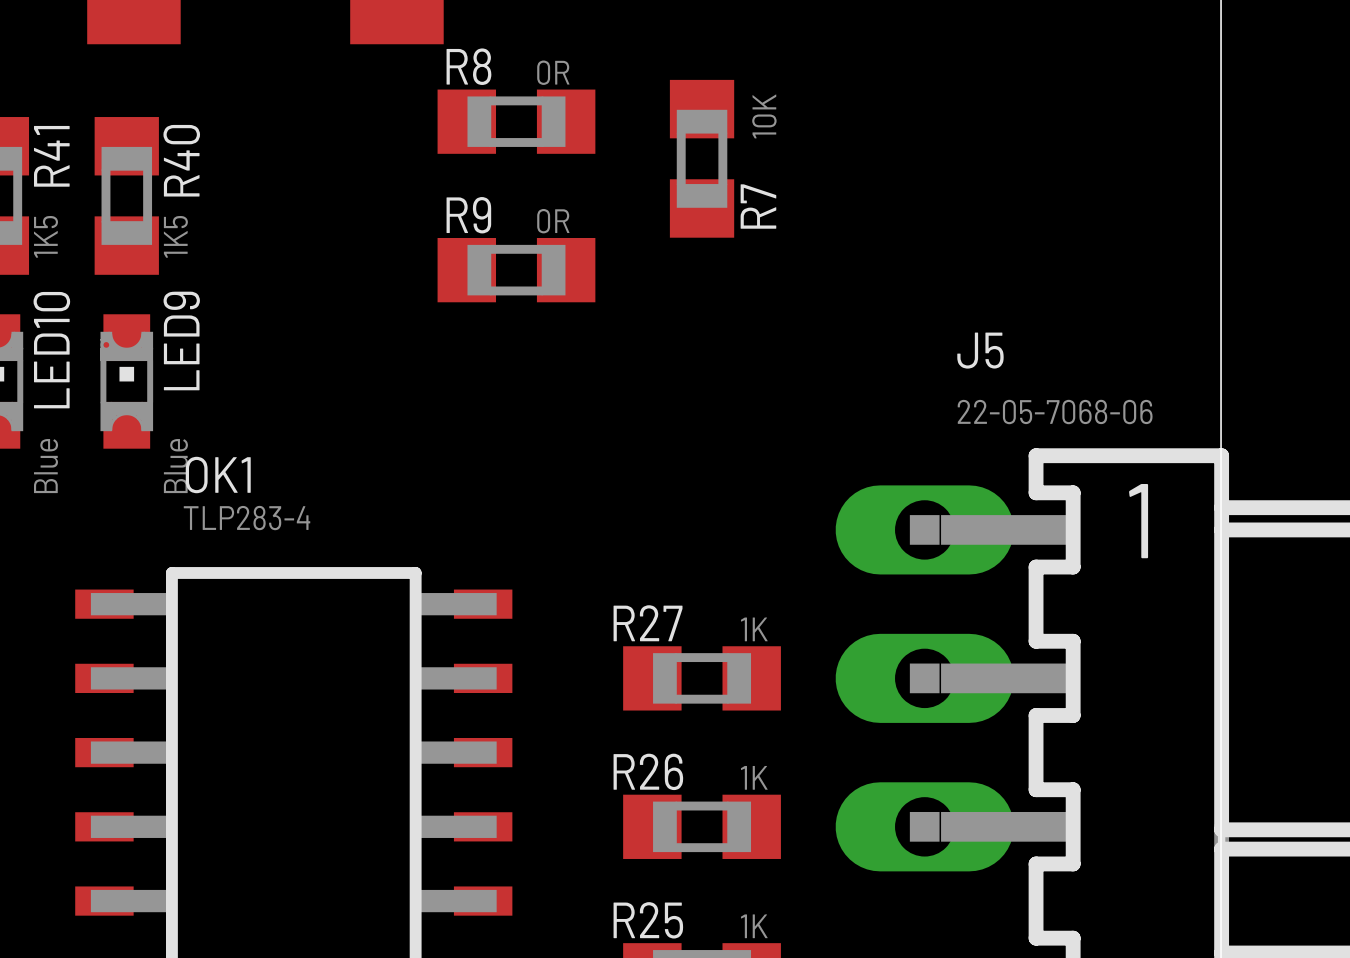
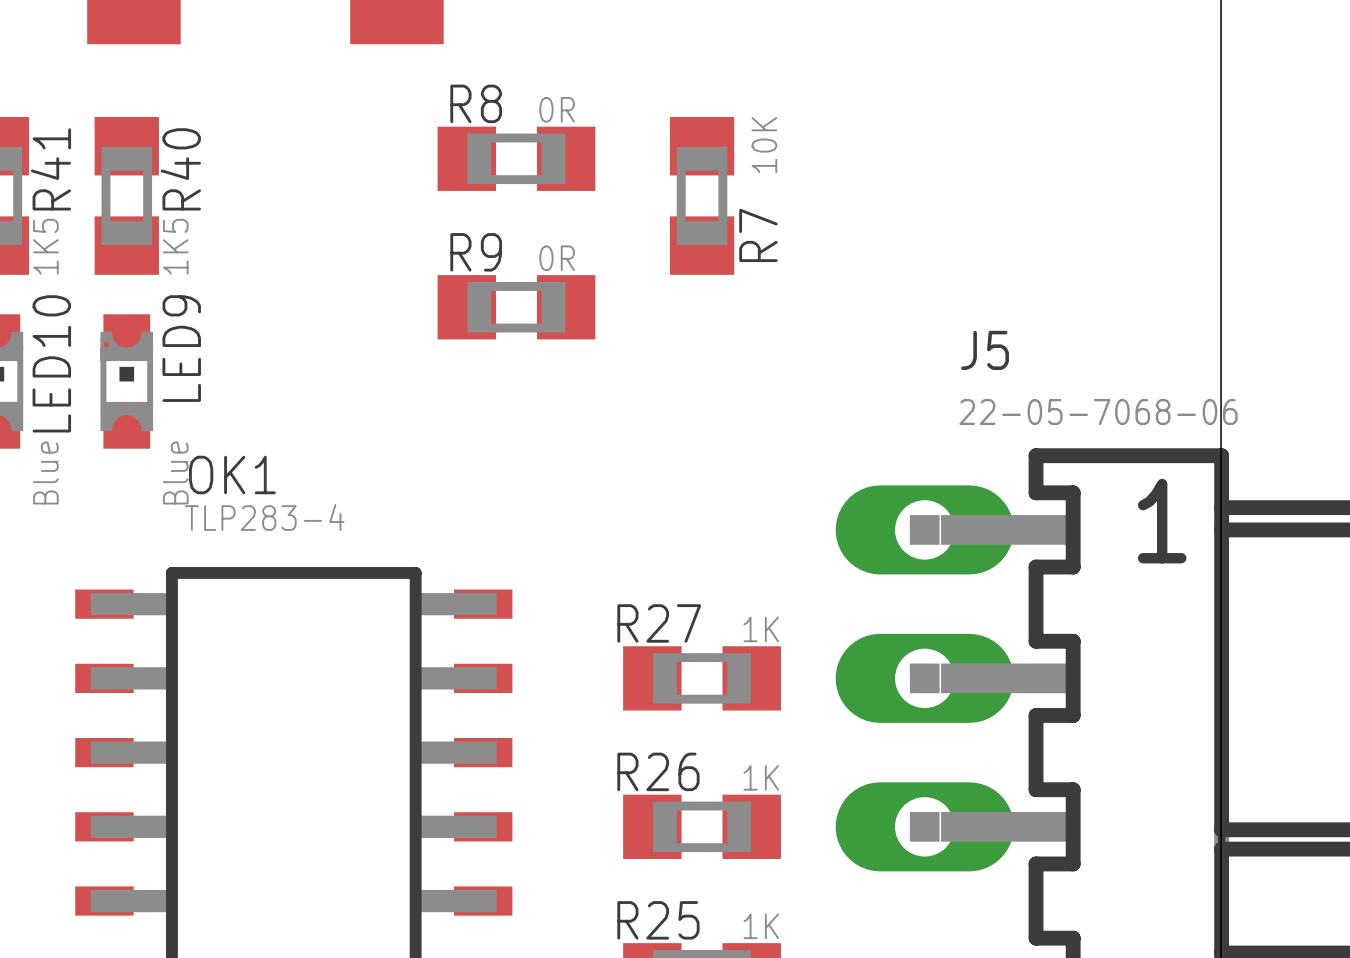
R8 position: (516, 121) -> (516, 158)
R7 position: (702, 158) -> (702, 195)
R9 position: (516, 270) -> (516, 307)

